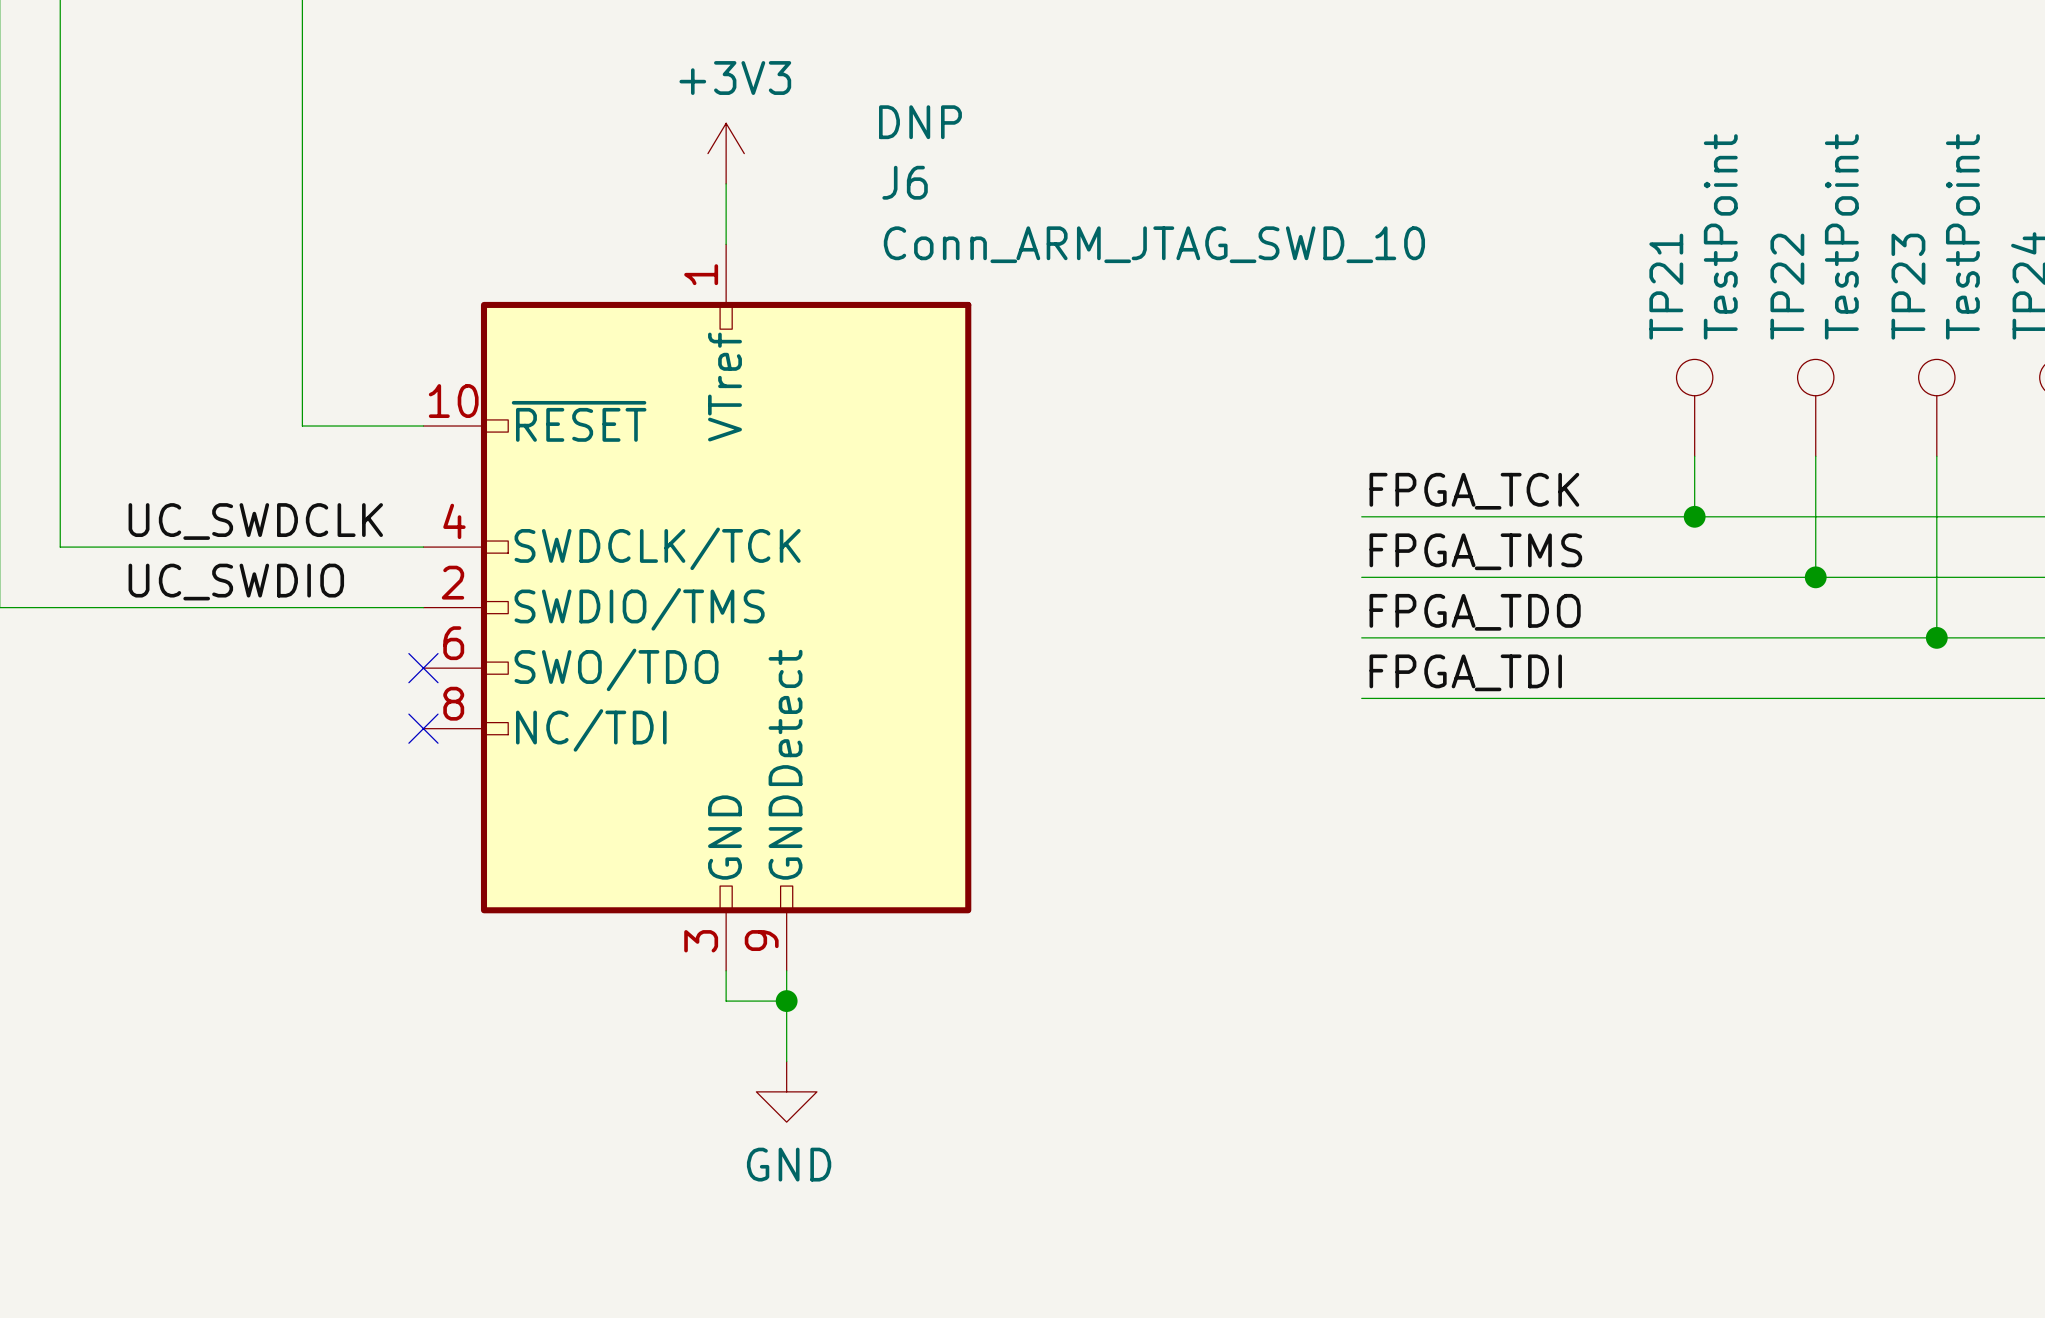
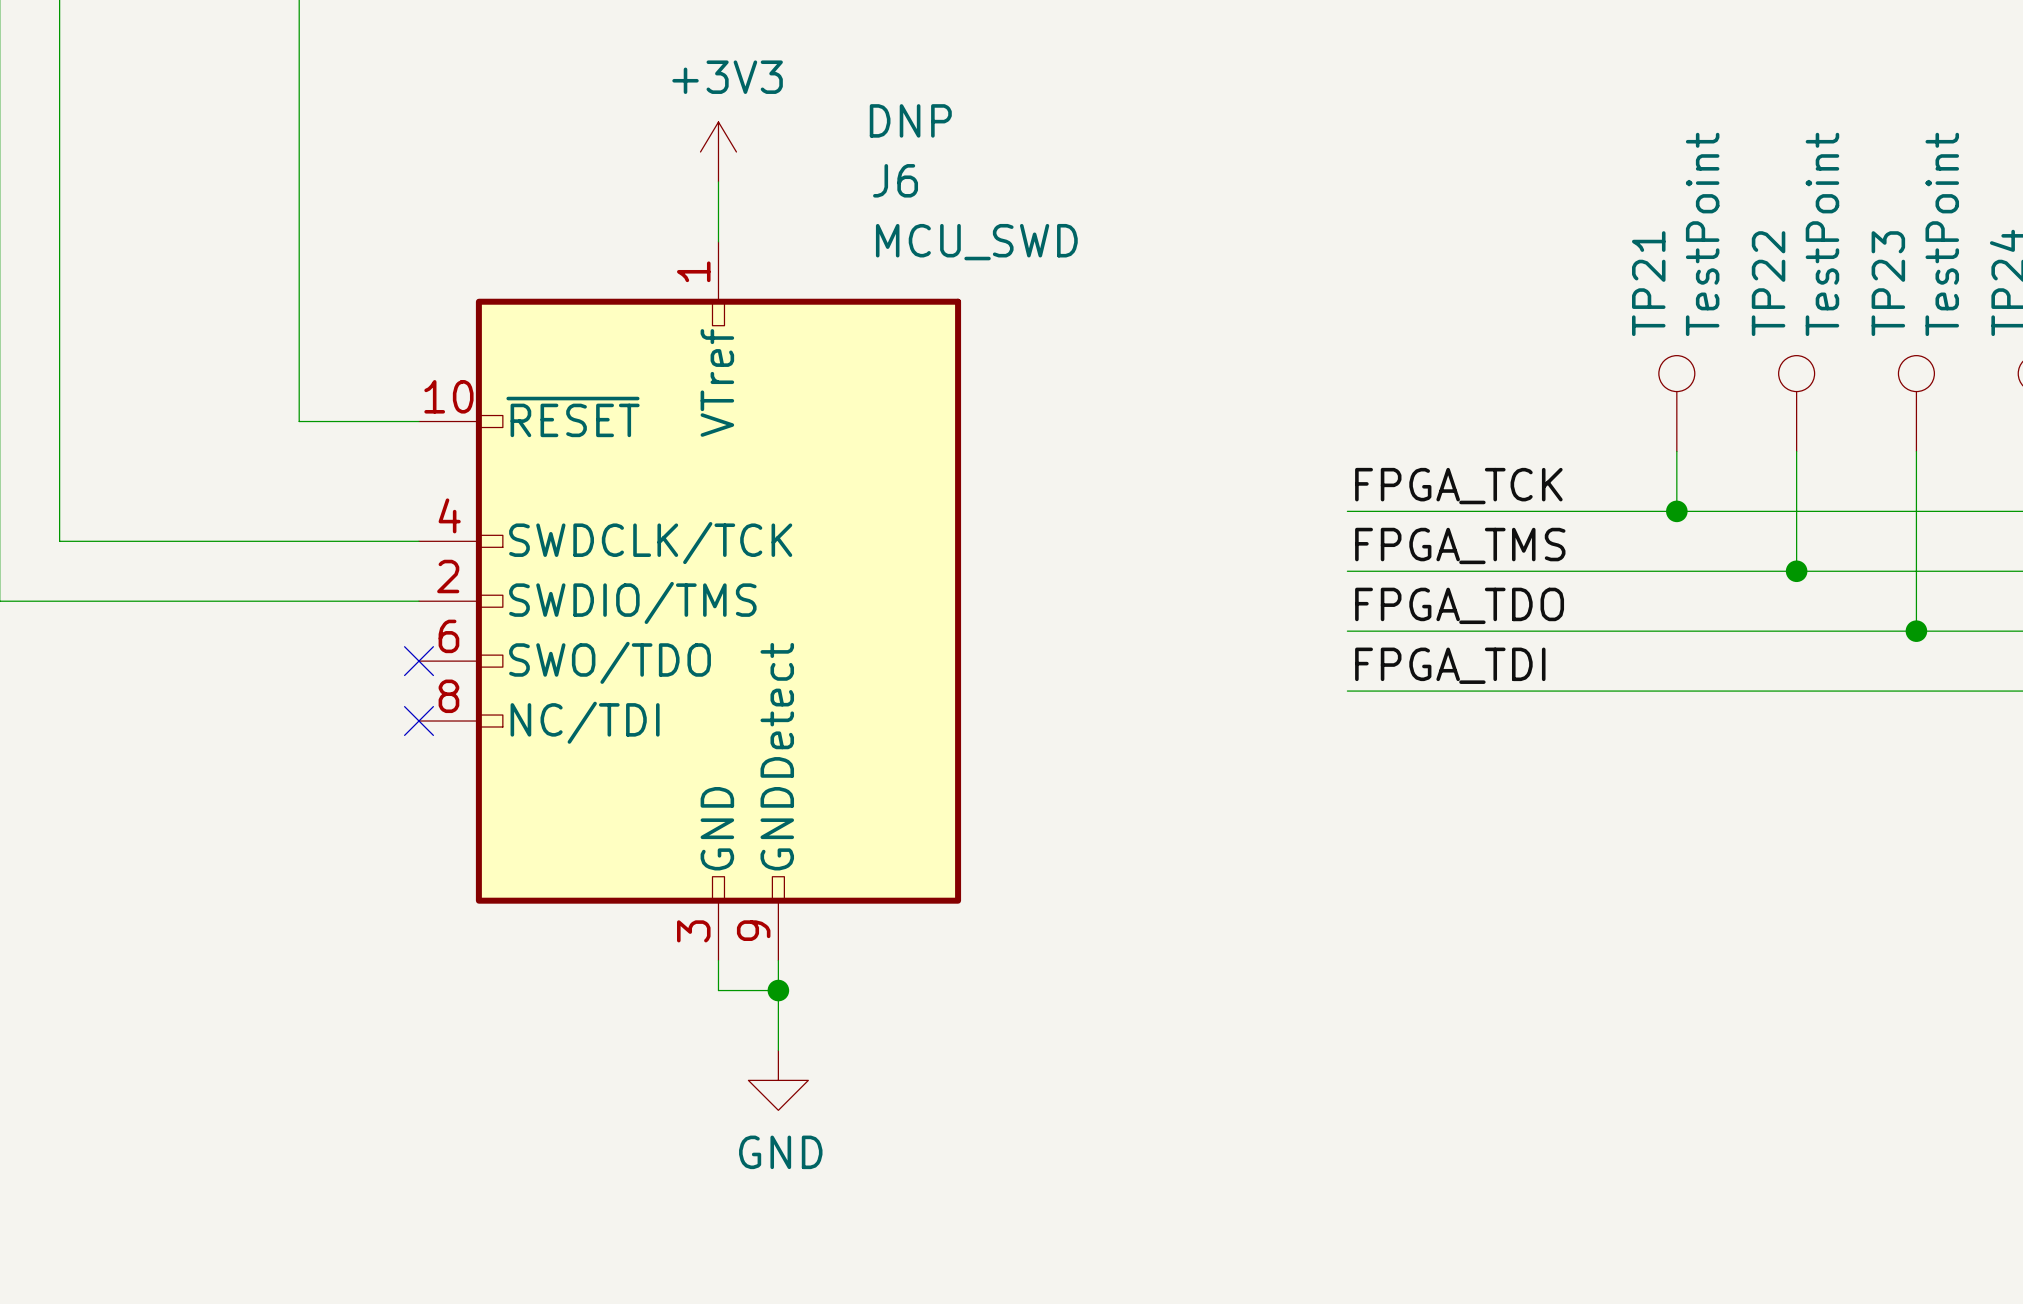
J6 value: Conn_ARM_JTAG_SWD_10 (1154, 244) -> MCU_SWD (976, 242)
label: UC_SWDCLK (255, 521) -> none
label: UC_SWDIO (236, 582) -> none

